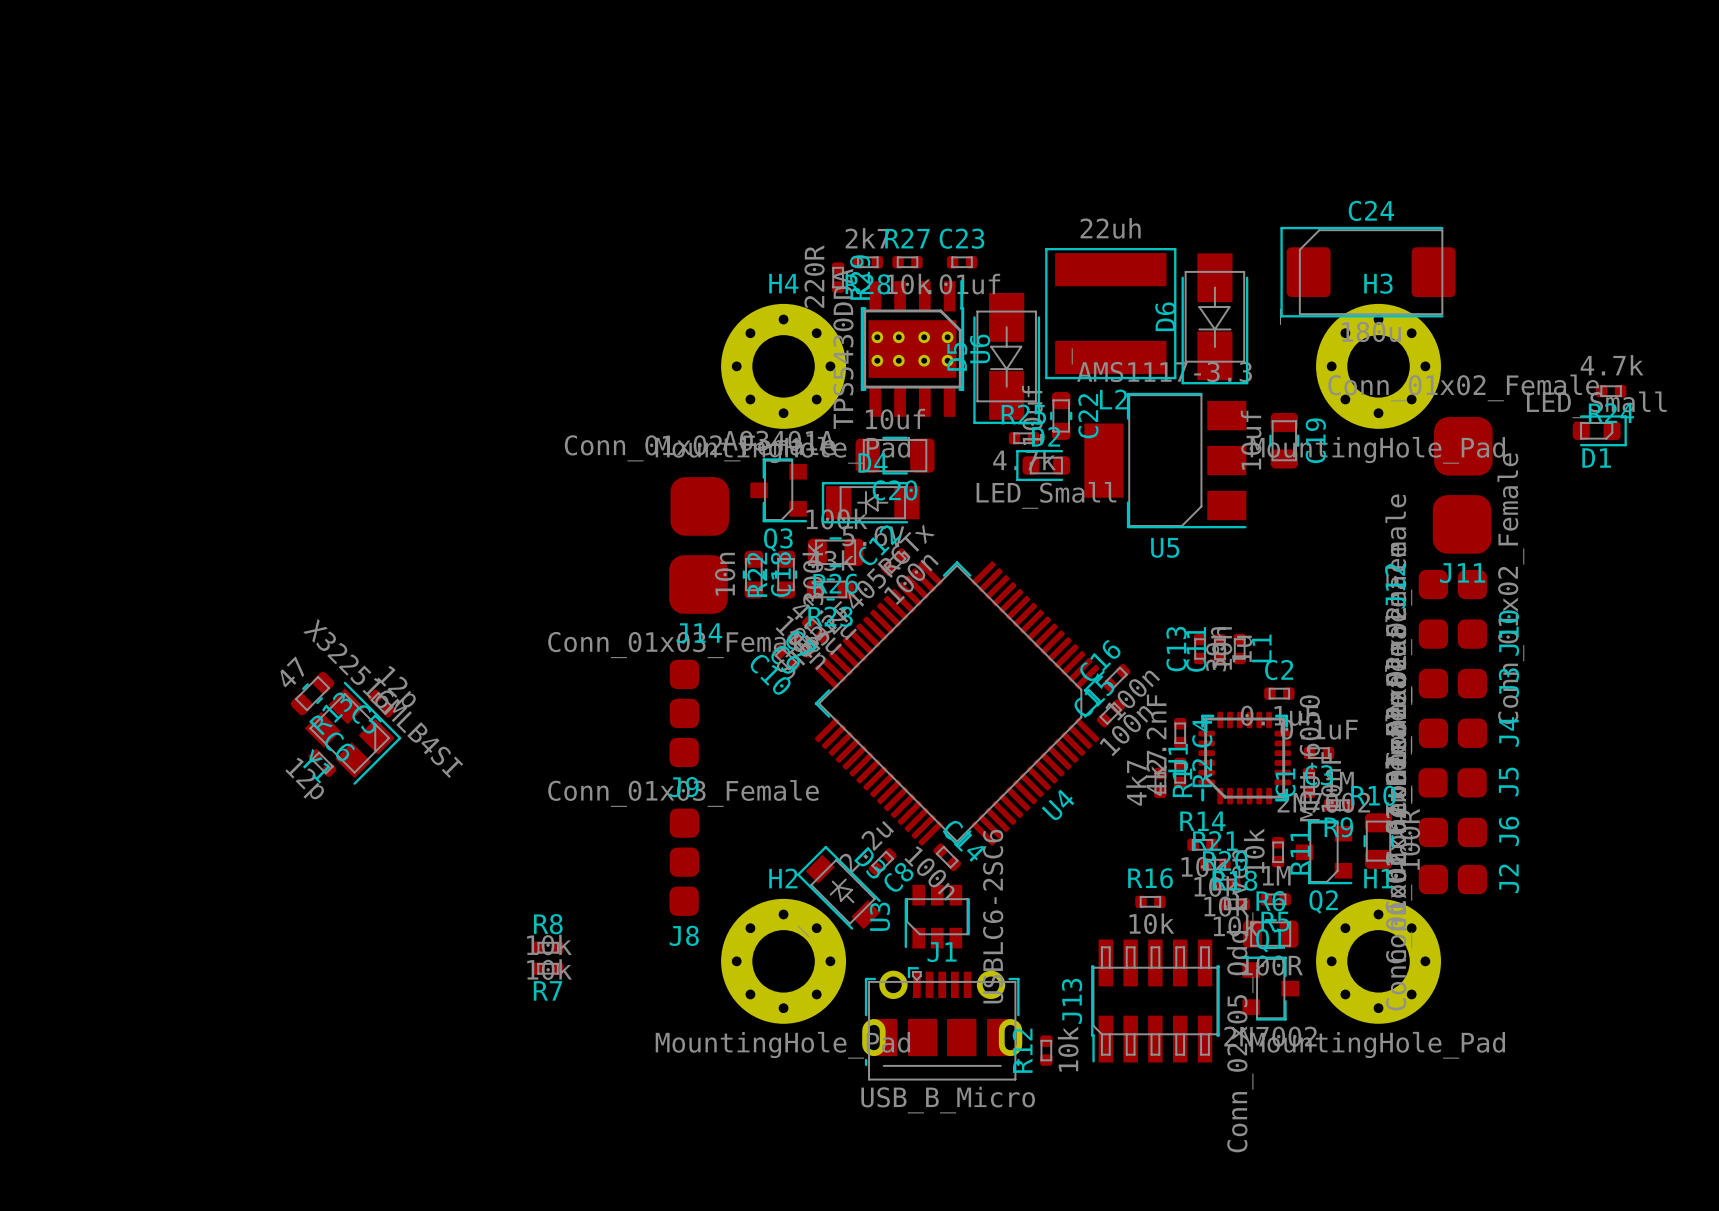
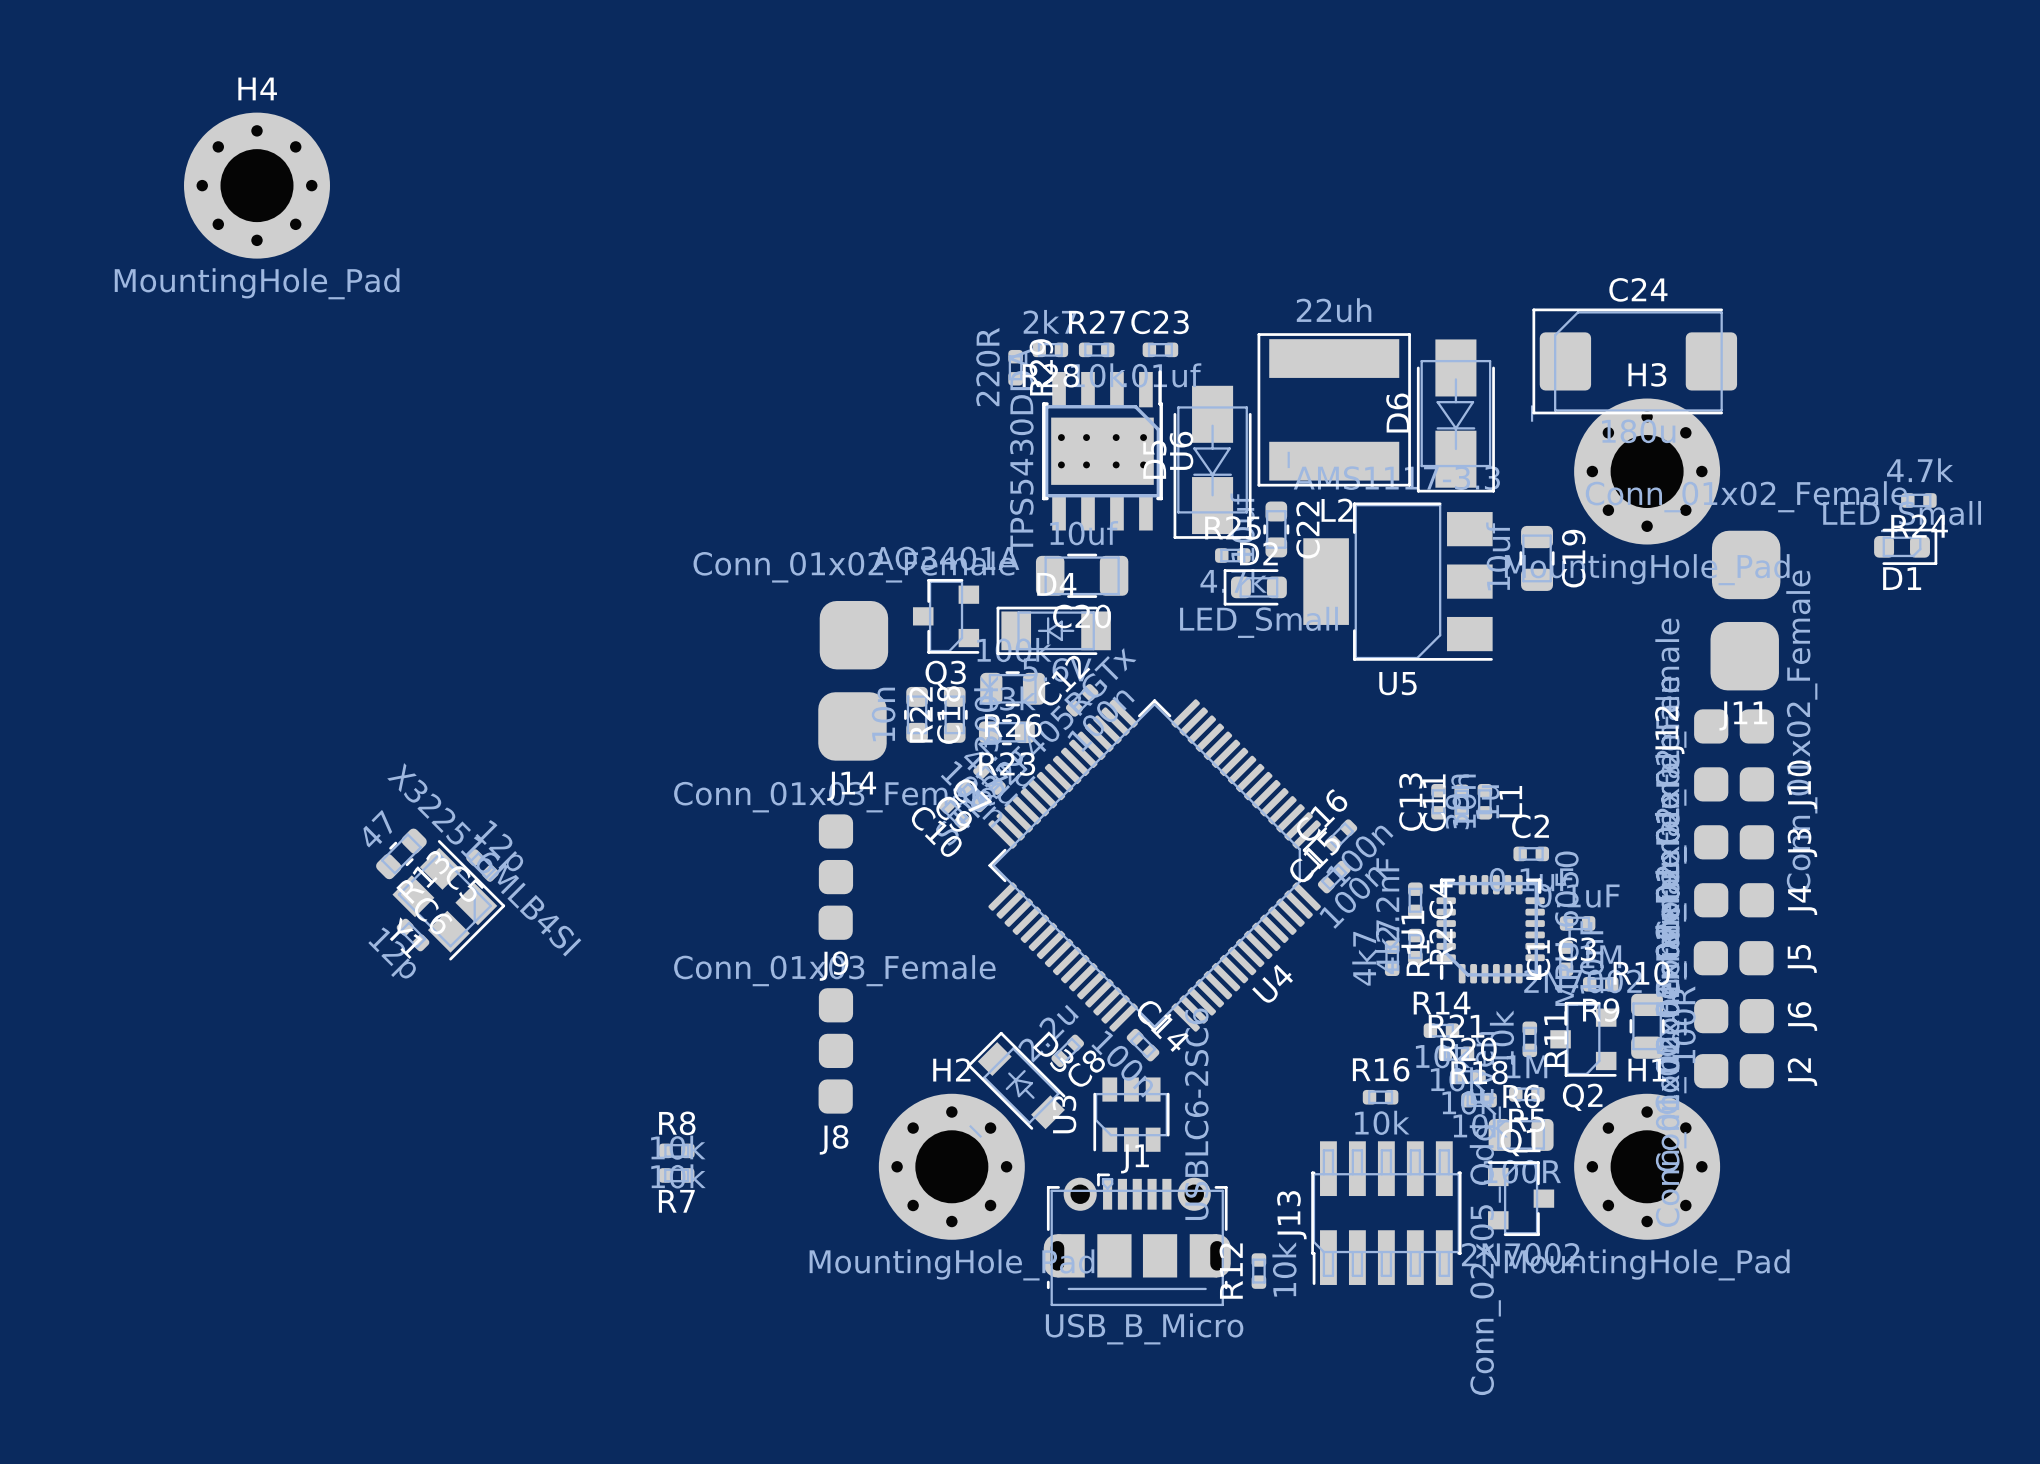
H4 position: (783, 366) -> (256, 185)

